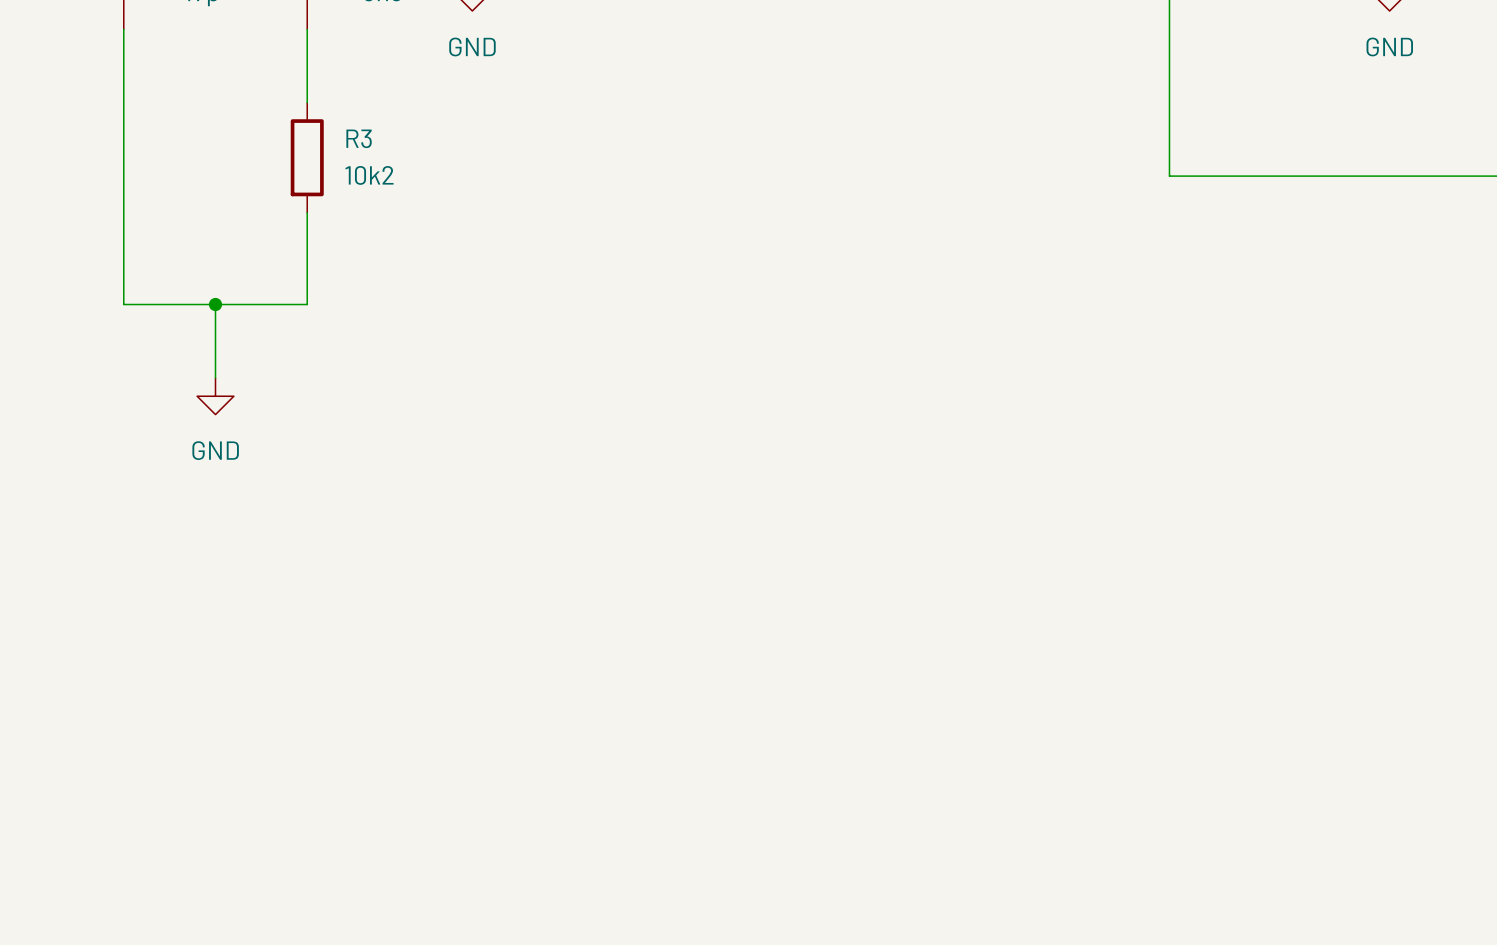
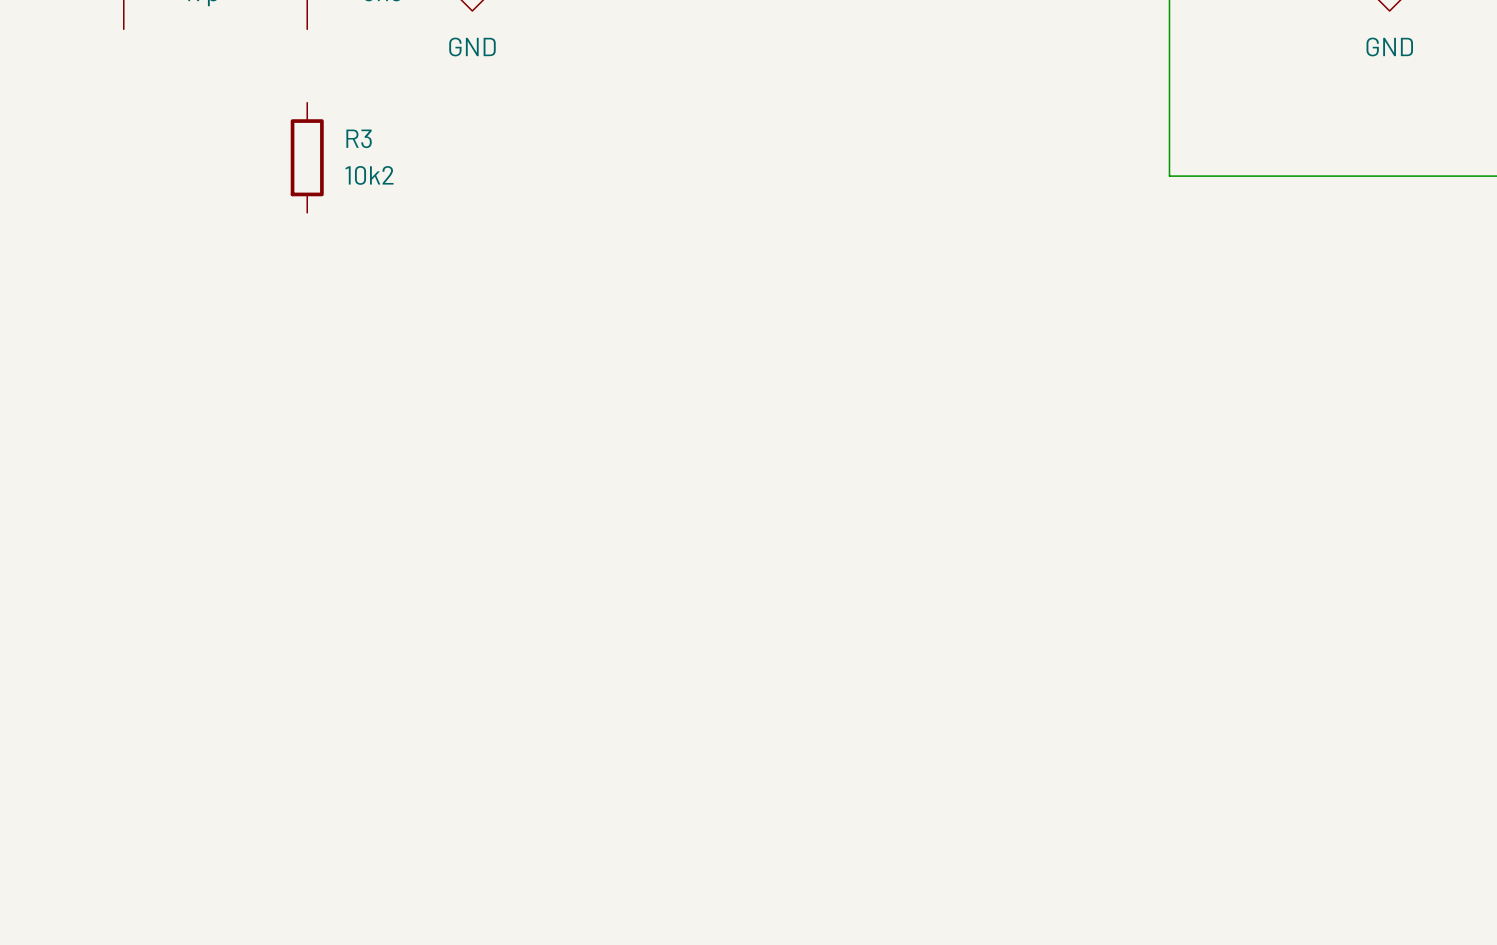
wire: (123, 29) (123, 304) (307, 304) (307, 212) -> none
wire: (307, 29) (307, 102) -> none
wire: (215, 304) (215, 377) -> none
junction: (215, 304) -> none
power symbol: GND (215, 396) -> none

